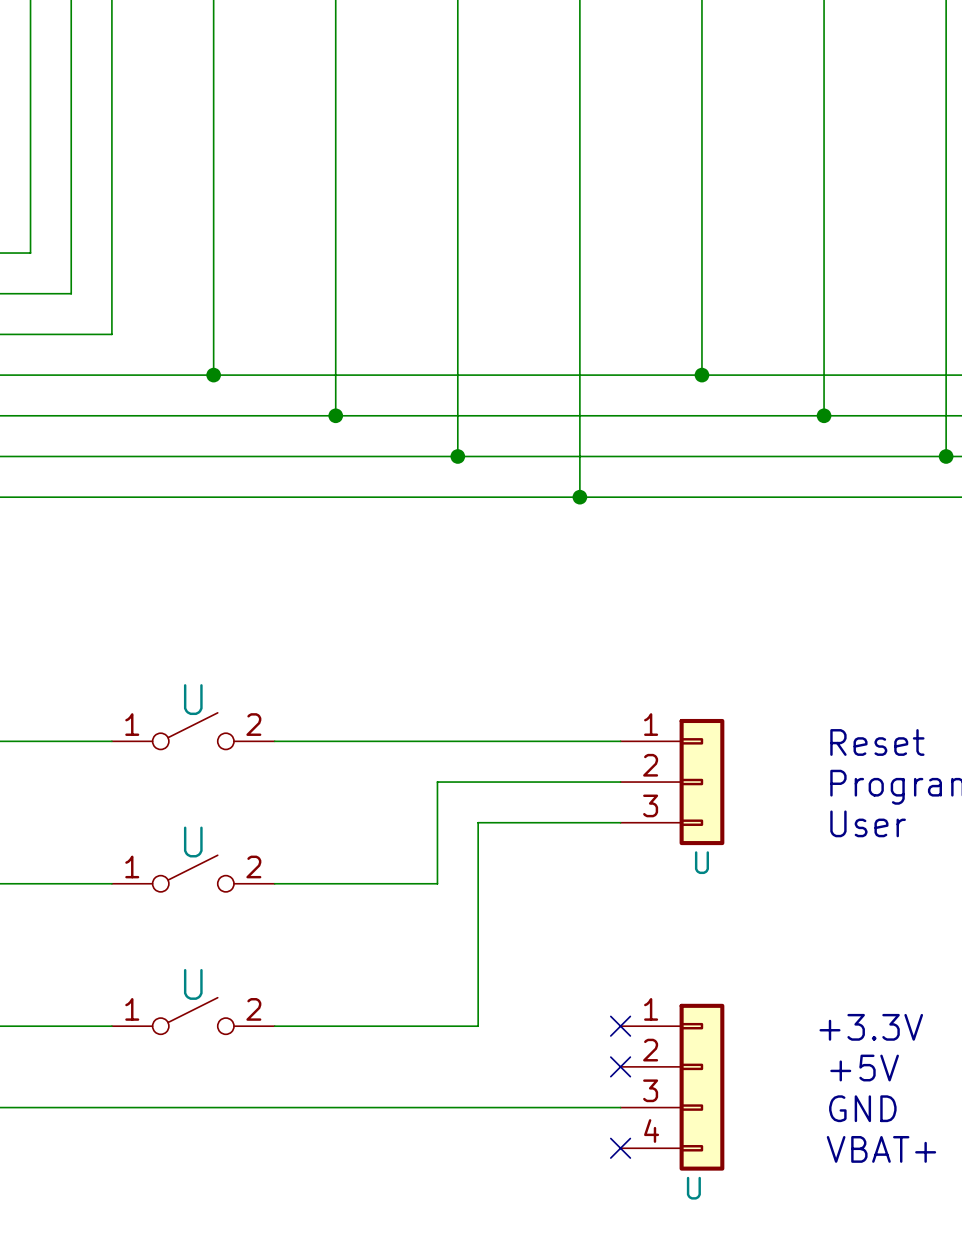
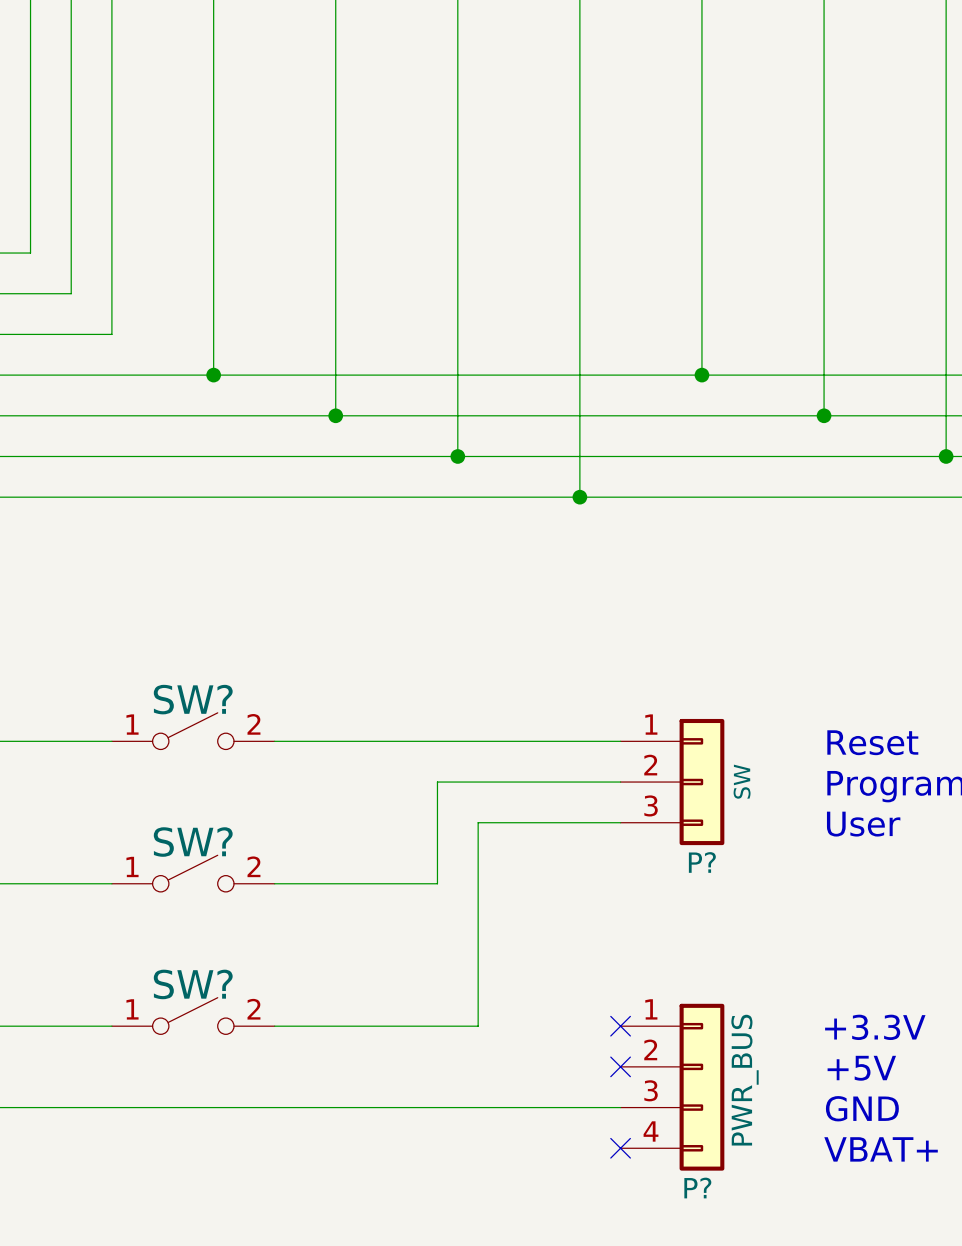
U name: U (193, 699) -> SW? (193, 699)
U value: none -> SW (742, 781)
U name: U (193, 842) -> SW? (193, 842)
U name: U (701, 862) -> P? (702, 862)
U name: U (193, 984) -> SW? (193, 984)
U value: none -> PWR_BUS (745, 1080)
U name: U (693, 1188) -> P? (697, 1188)

